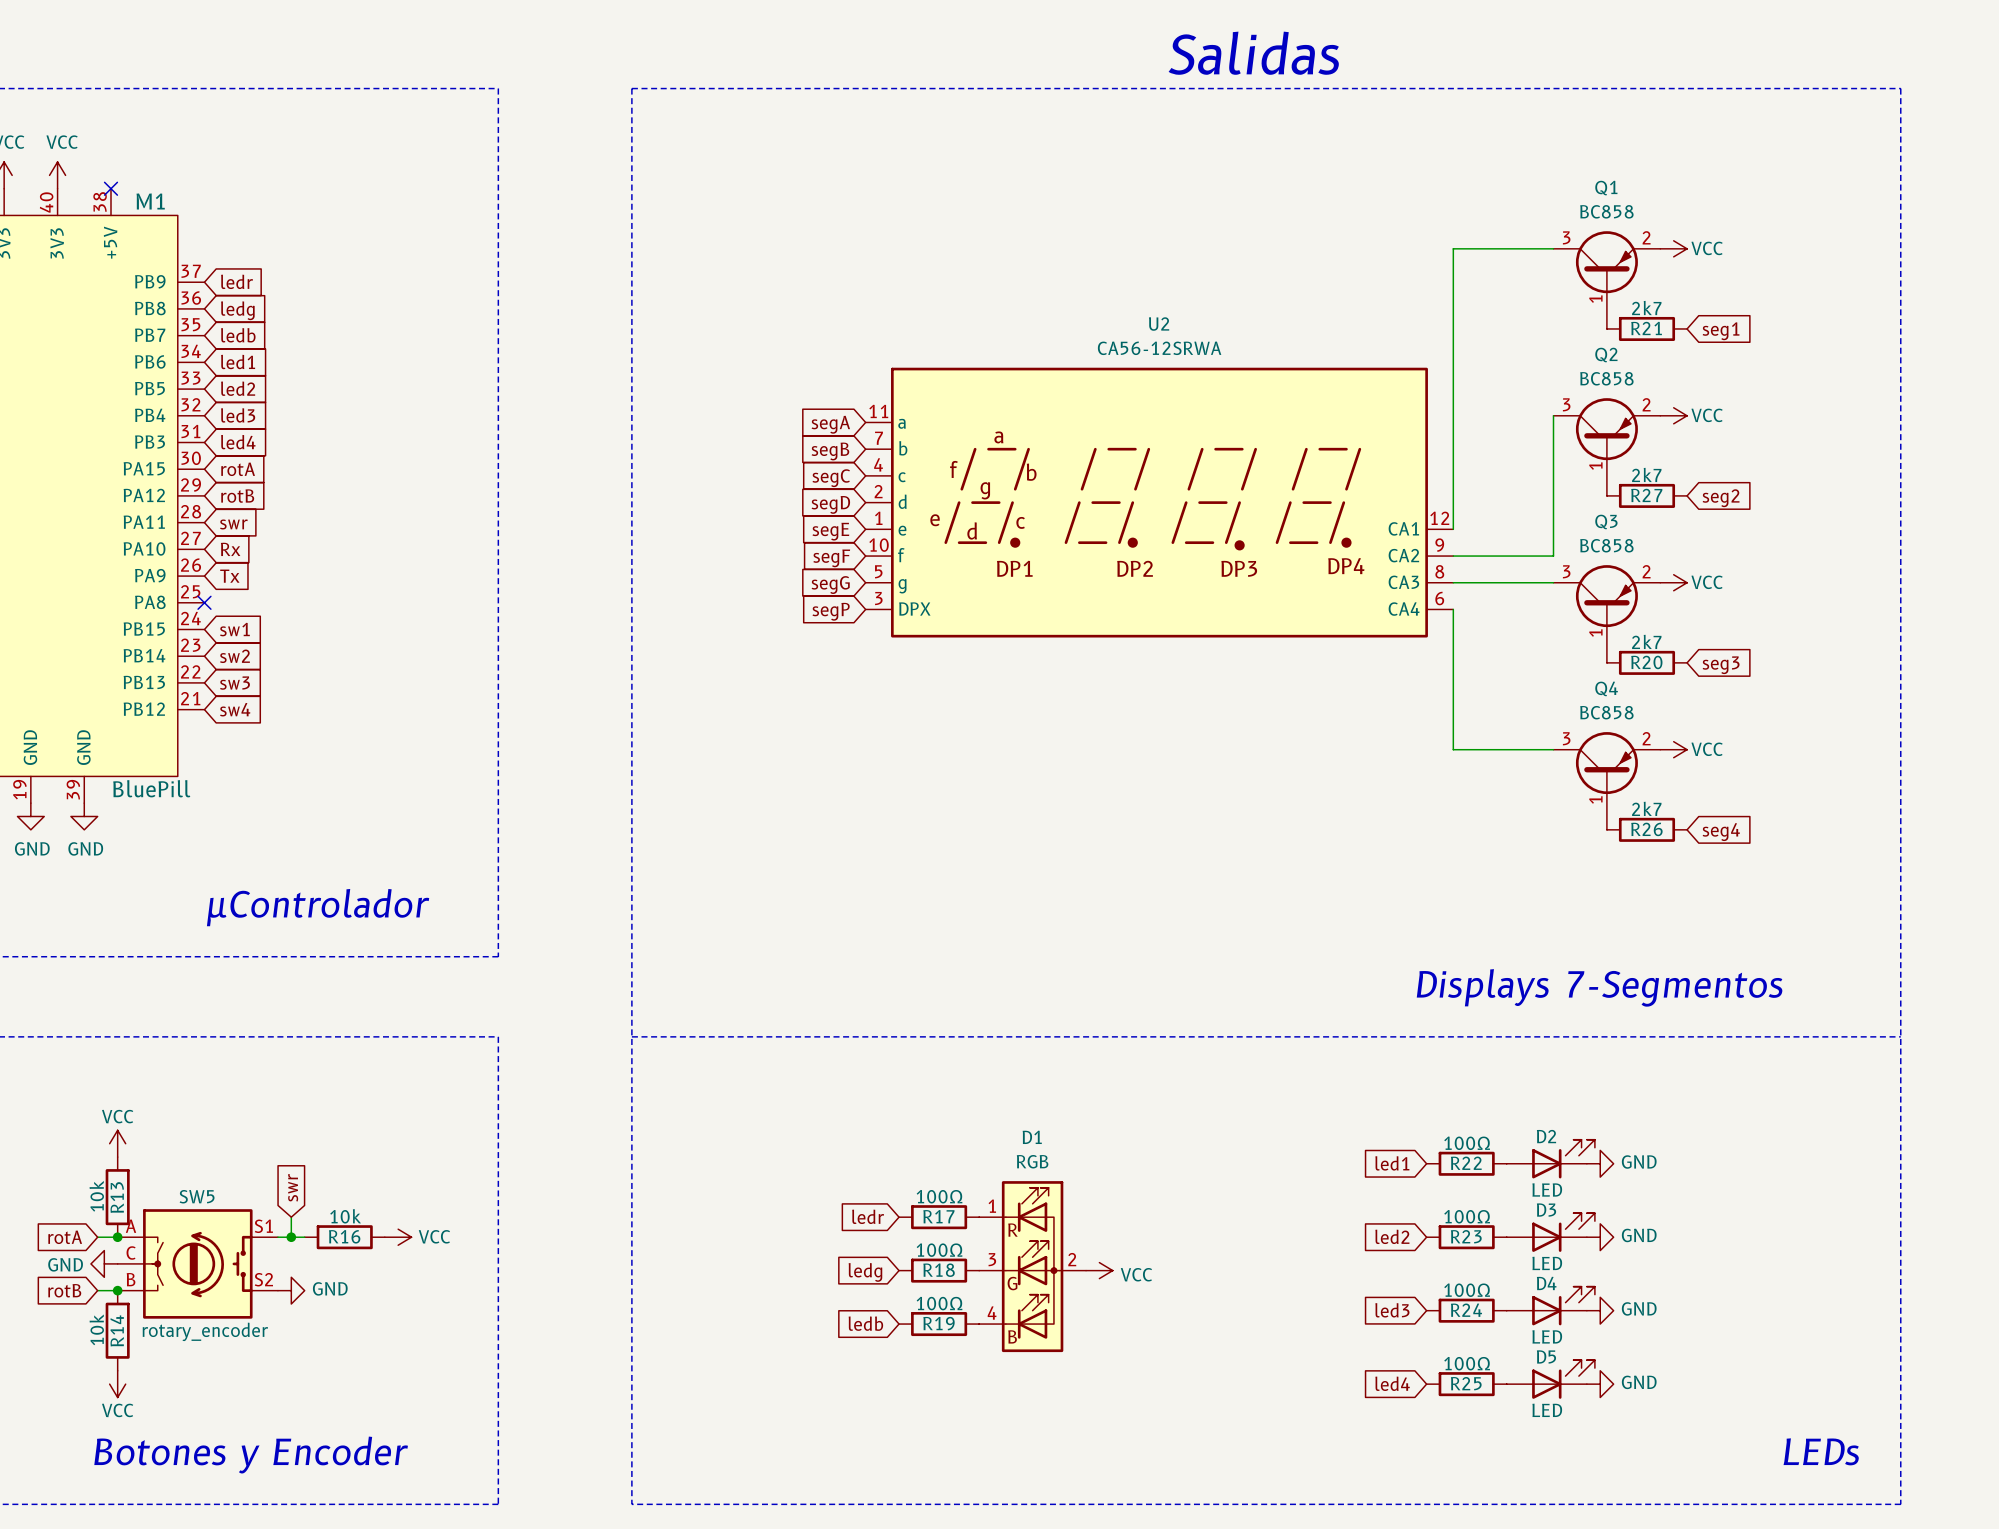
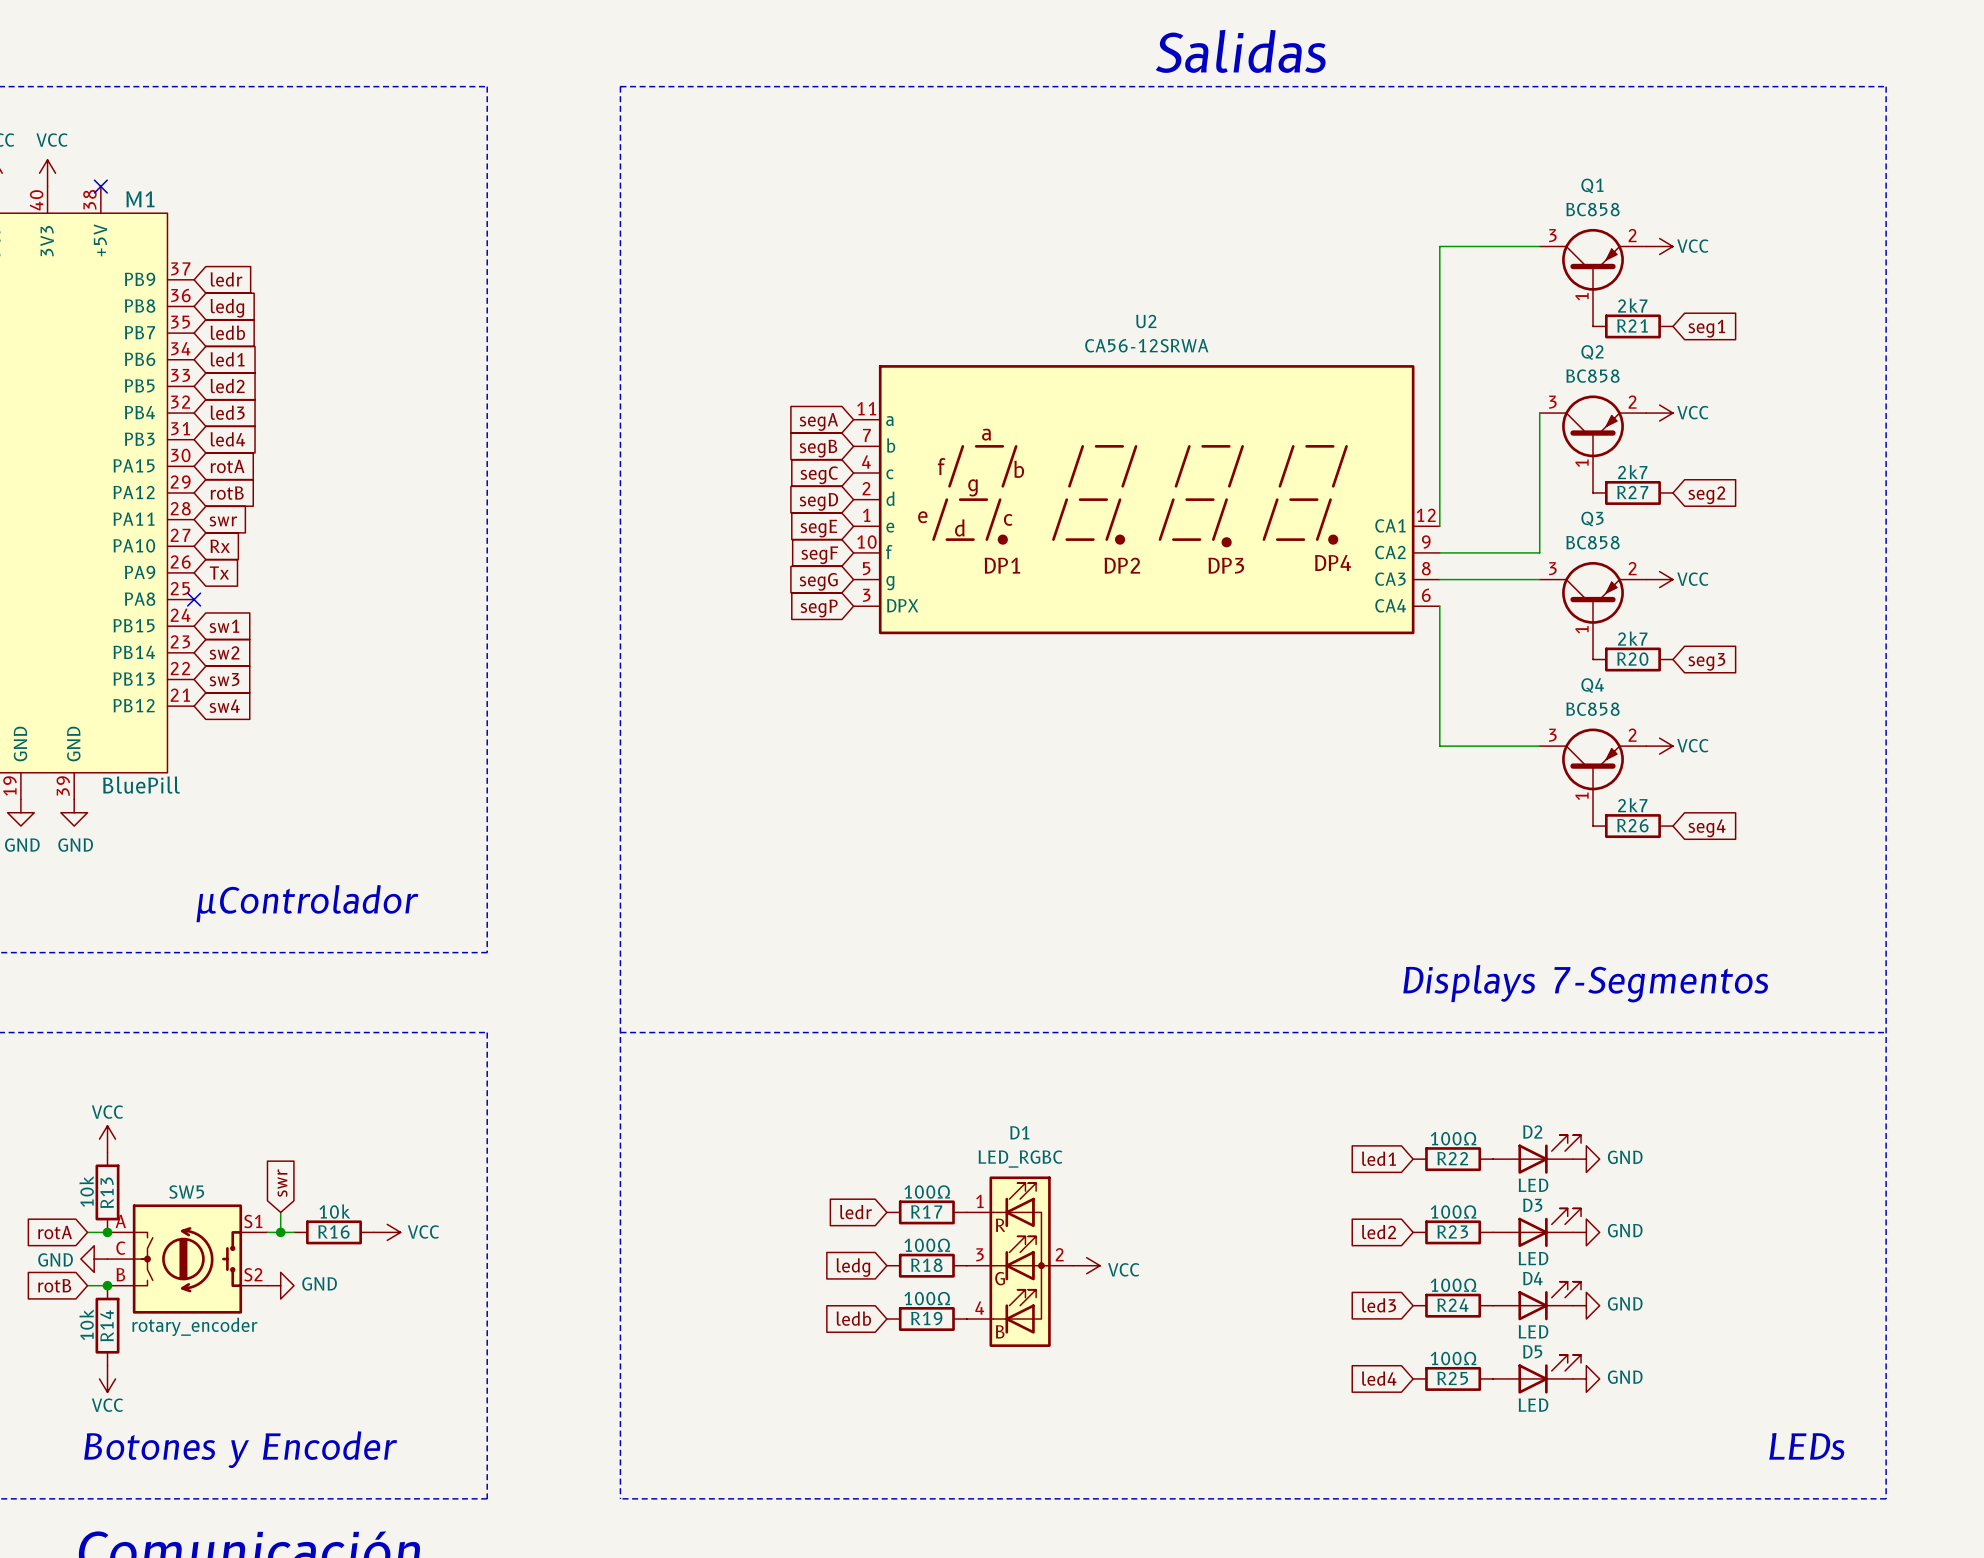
D1 value: RGB (1032, 1161) -> LED_RGBC (1020, 1159)

